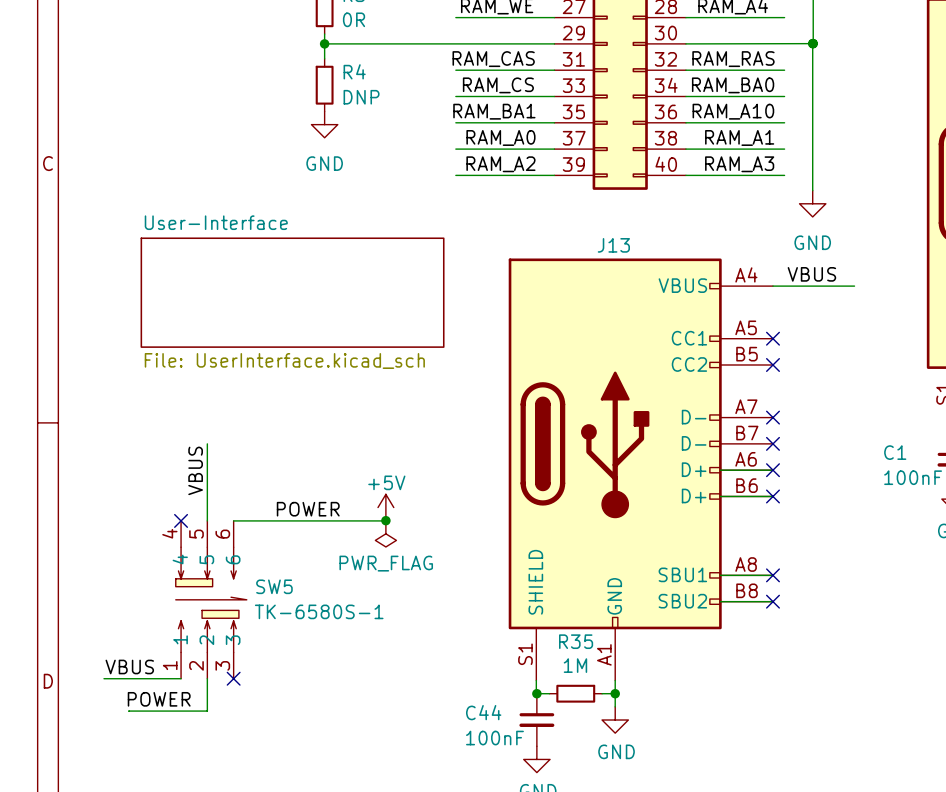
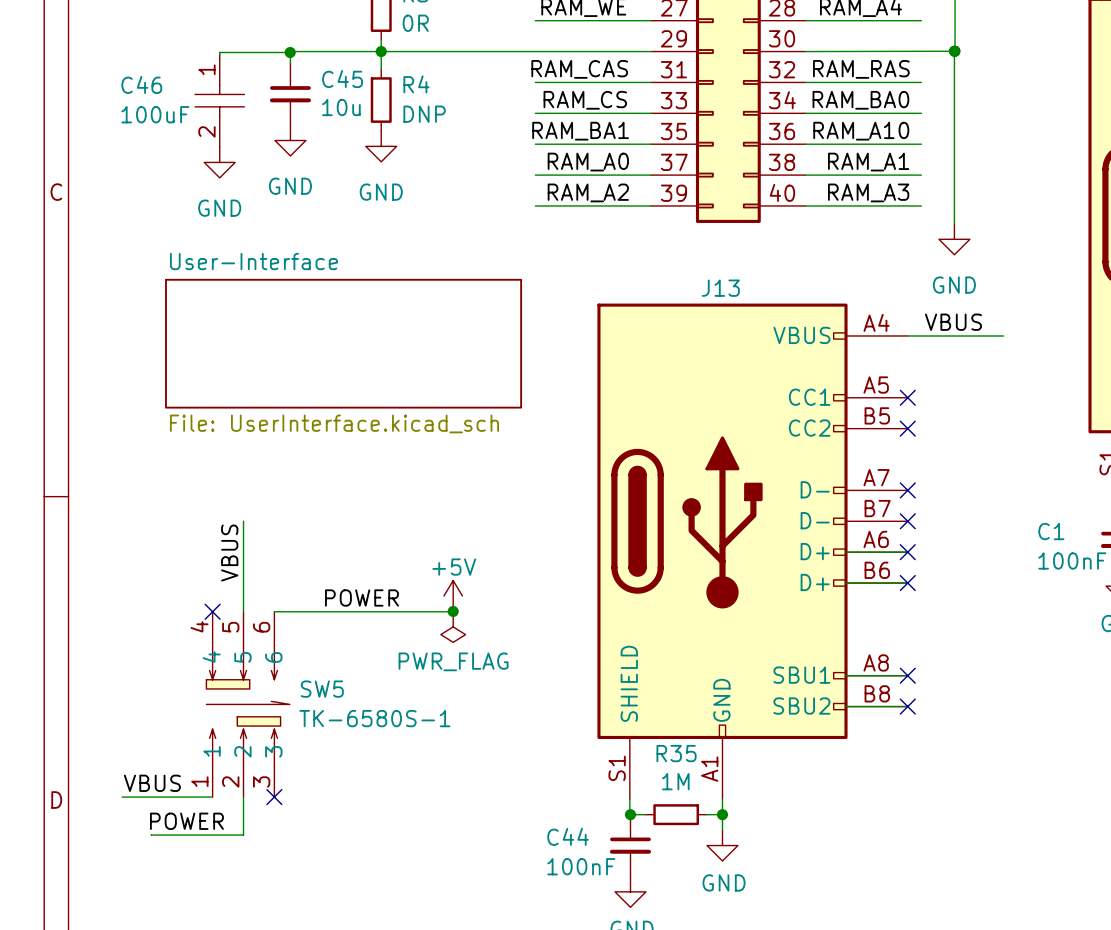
wire: none -> (381, 51) (290, 52)
junction: none -> (290, 52)
wire: none -> (219, 54) (219, 52) (290, 52) (290, 63)
C45: none -> 10u (290, 94)
C46: none -> 100uF (219, 100)
power symbol: none -> GND (290, 140)
power symbol: none -> GND (219, 162)

